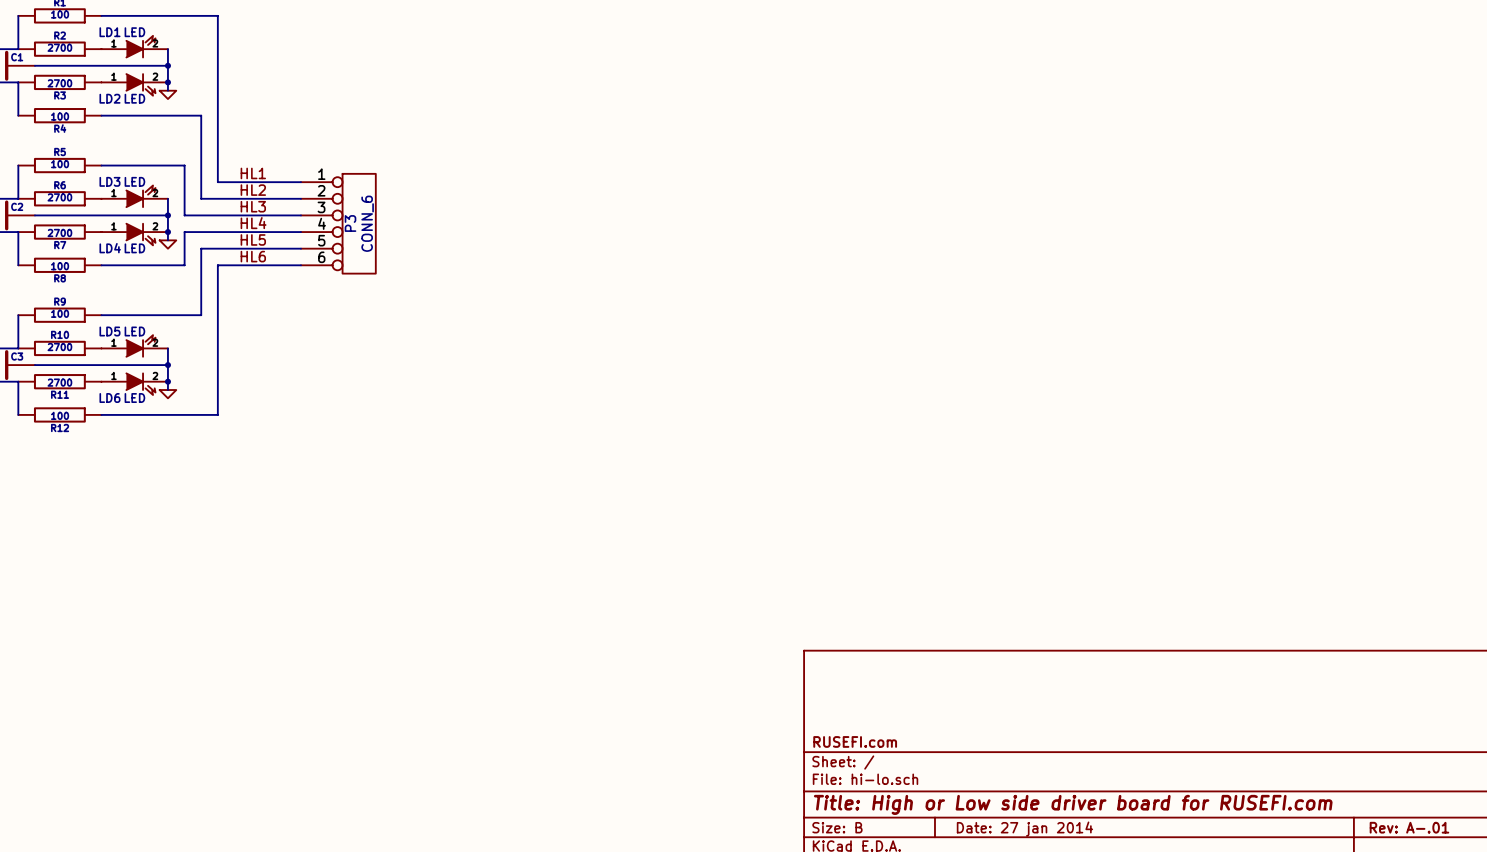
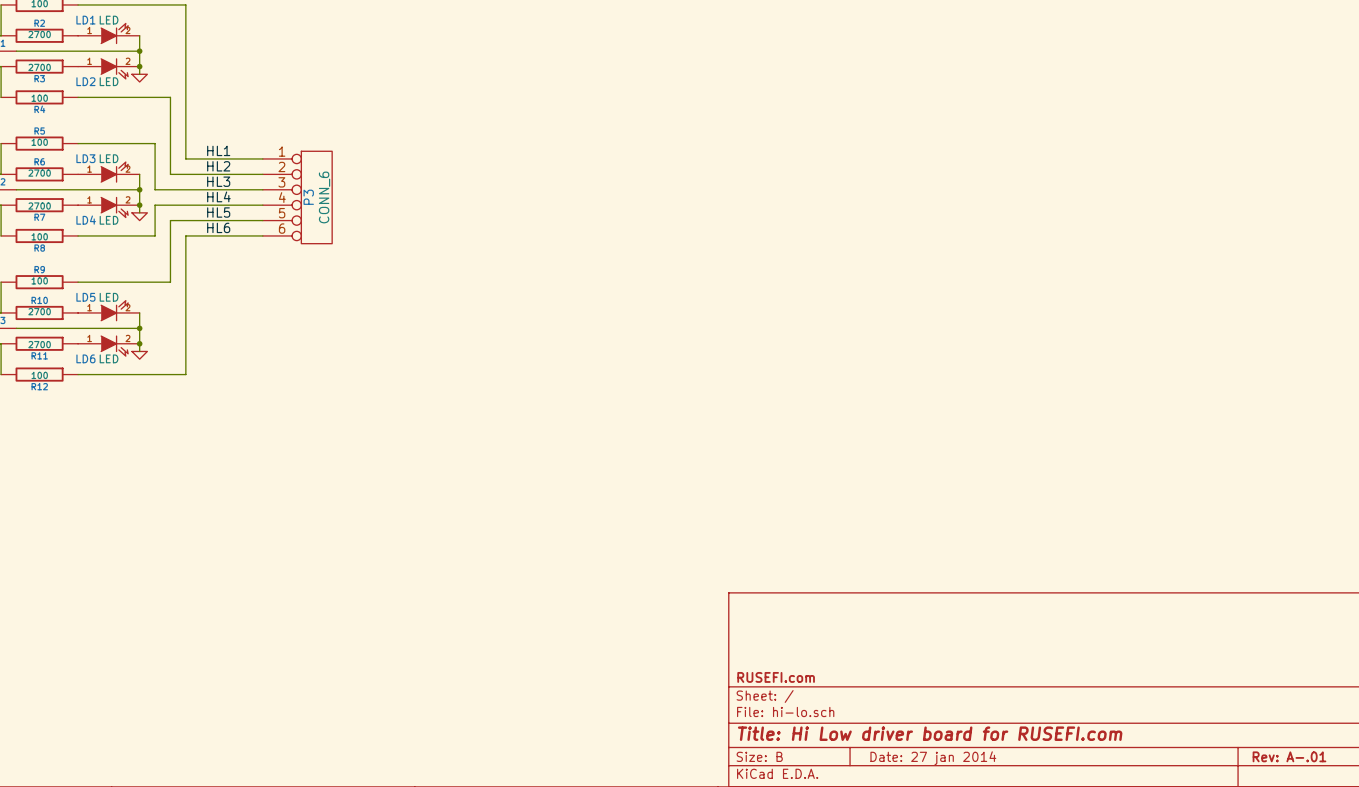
title block: Title: High or Low side driver board for RUSEFI.com (1073, 804) -> Title: Hi Low driver board for RUSEFI.com (930, 733)

